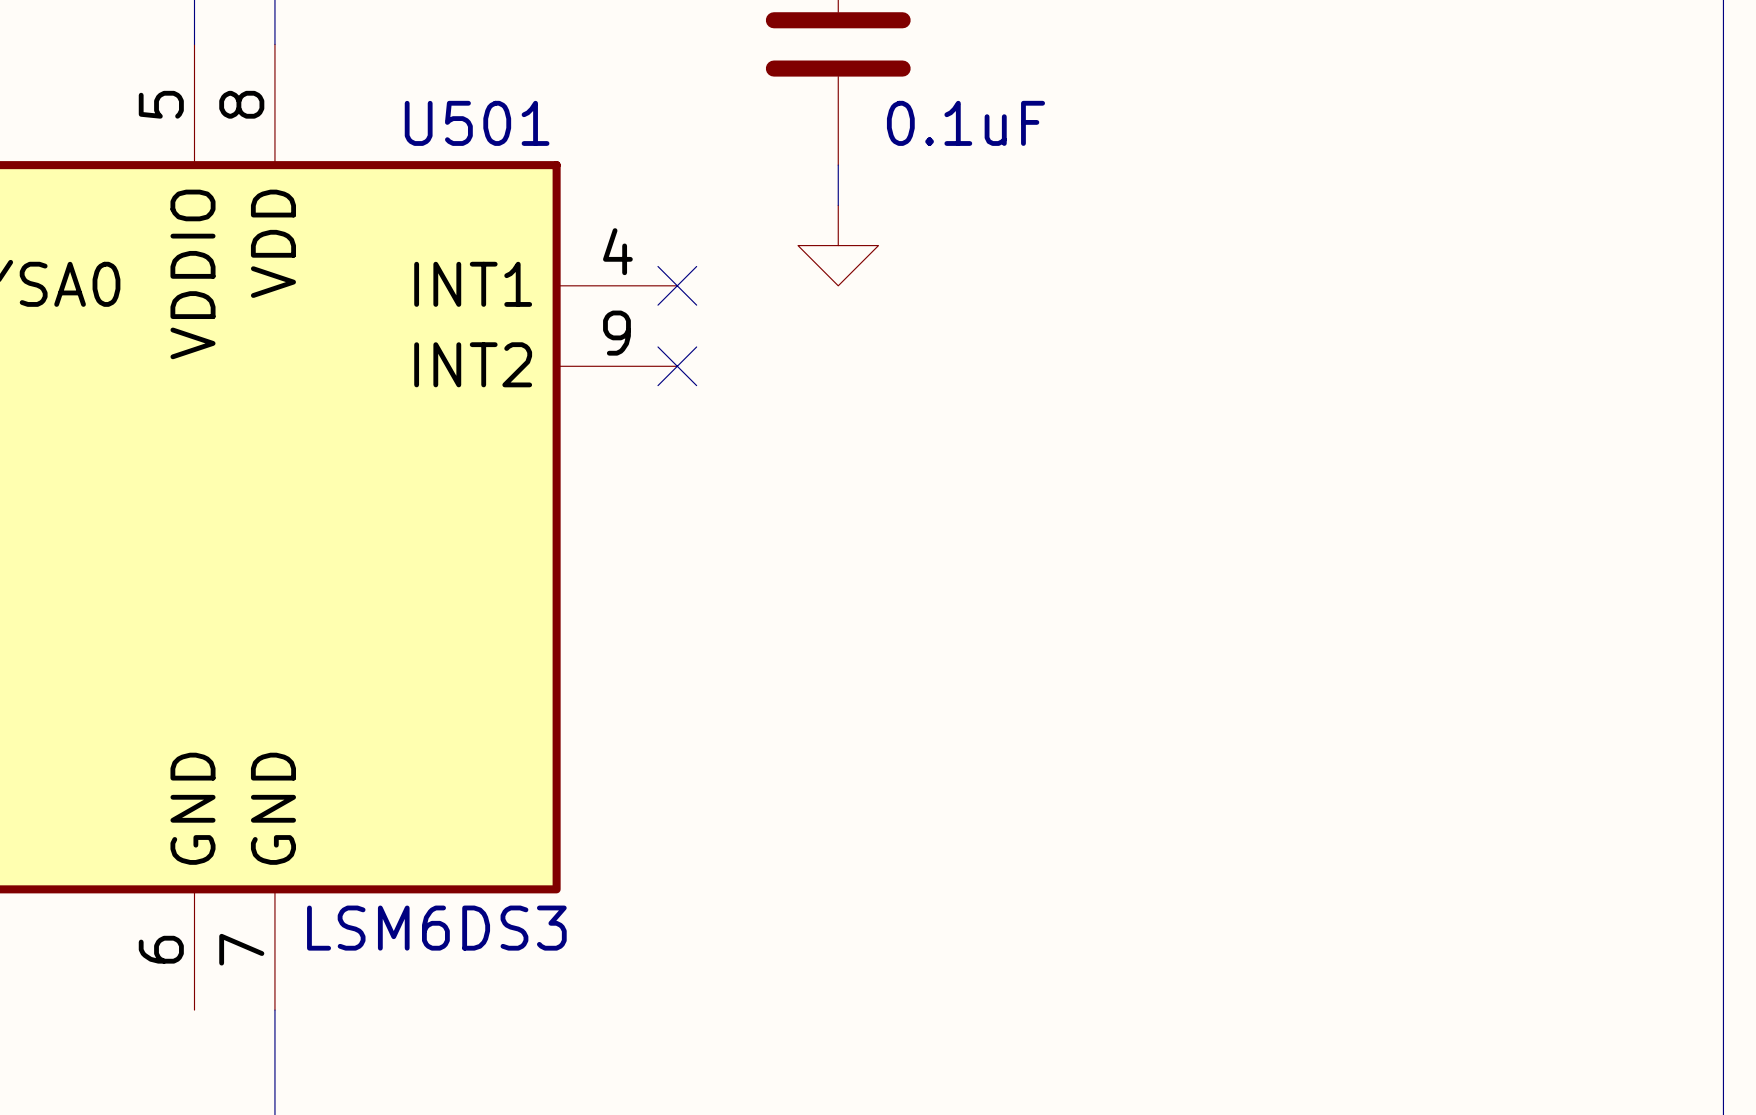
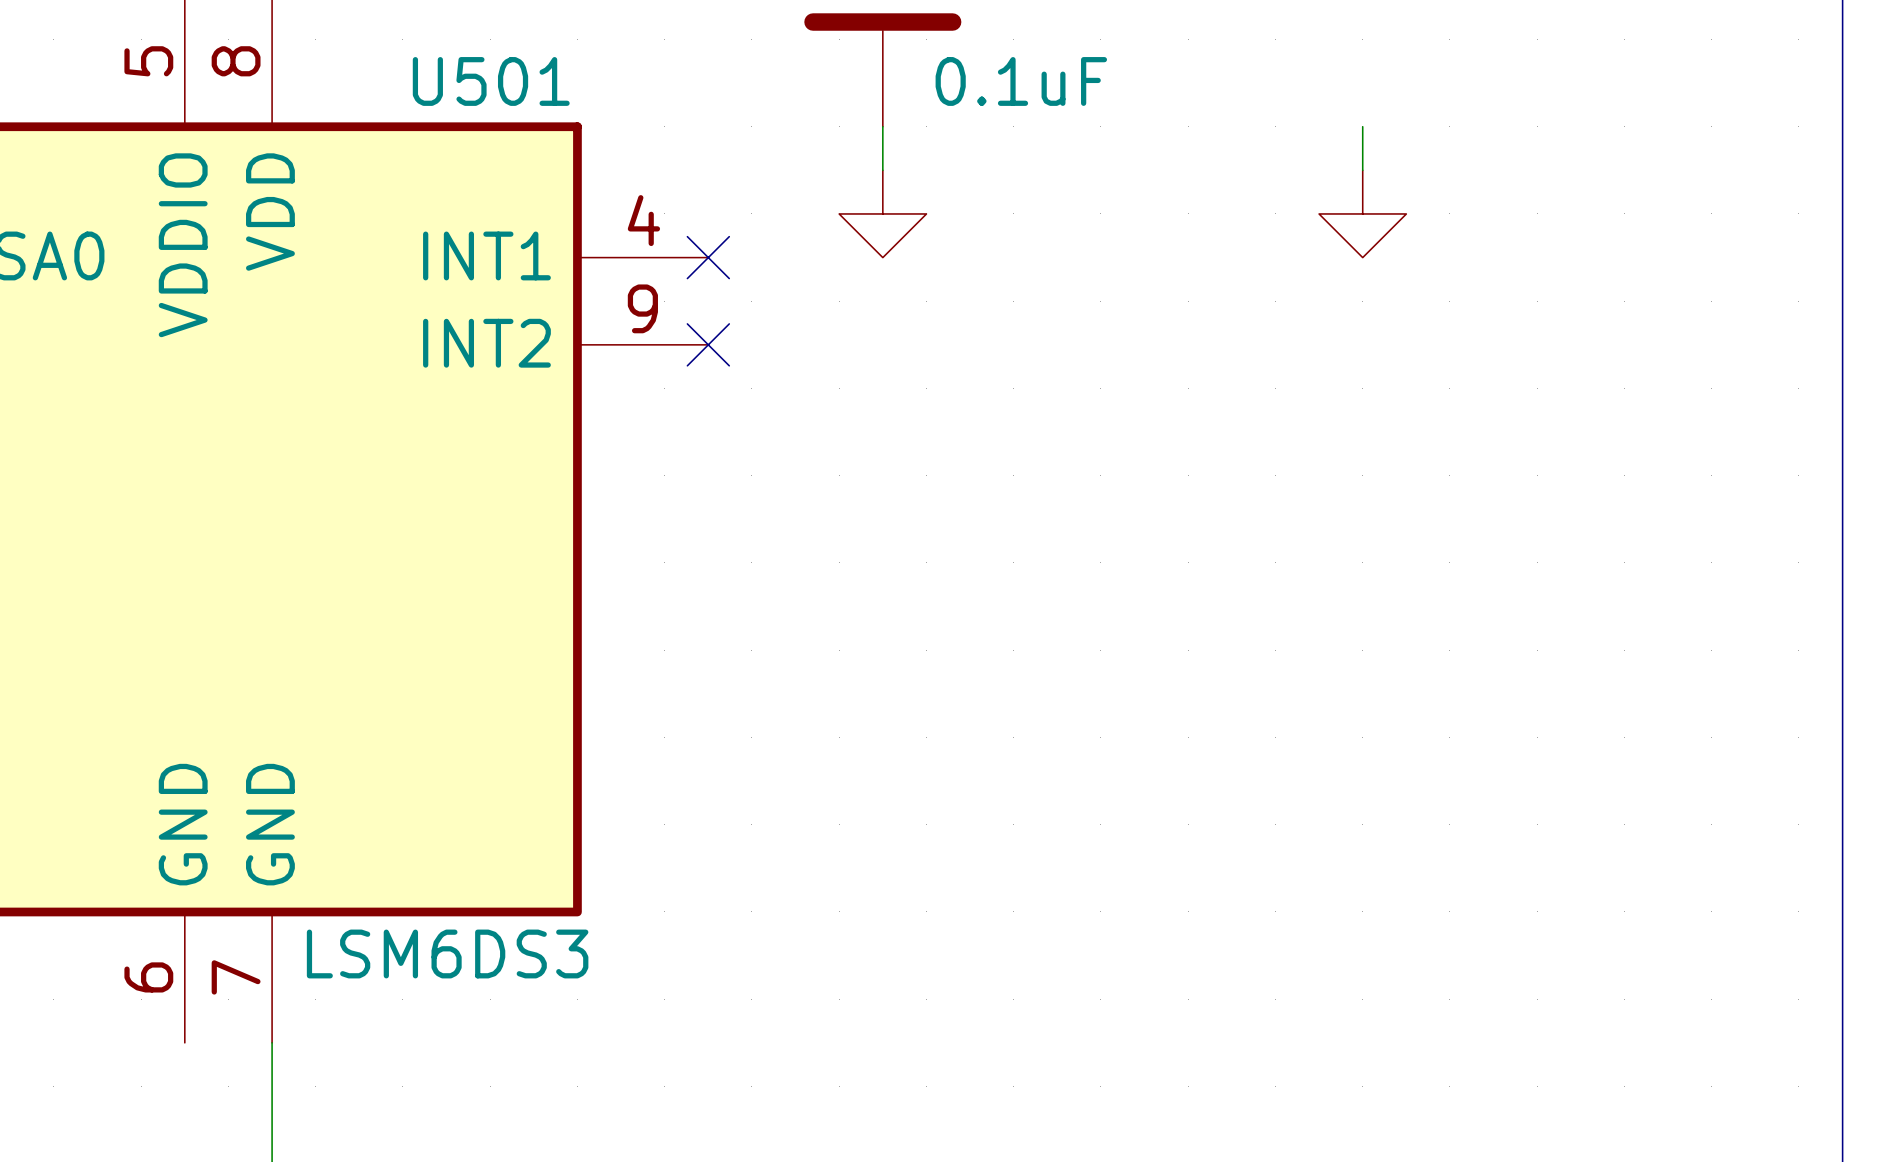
wire: none -> (1362, 126) (1362, 170)
power symbol: none -> (1362, 213)

